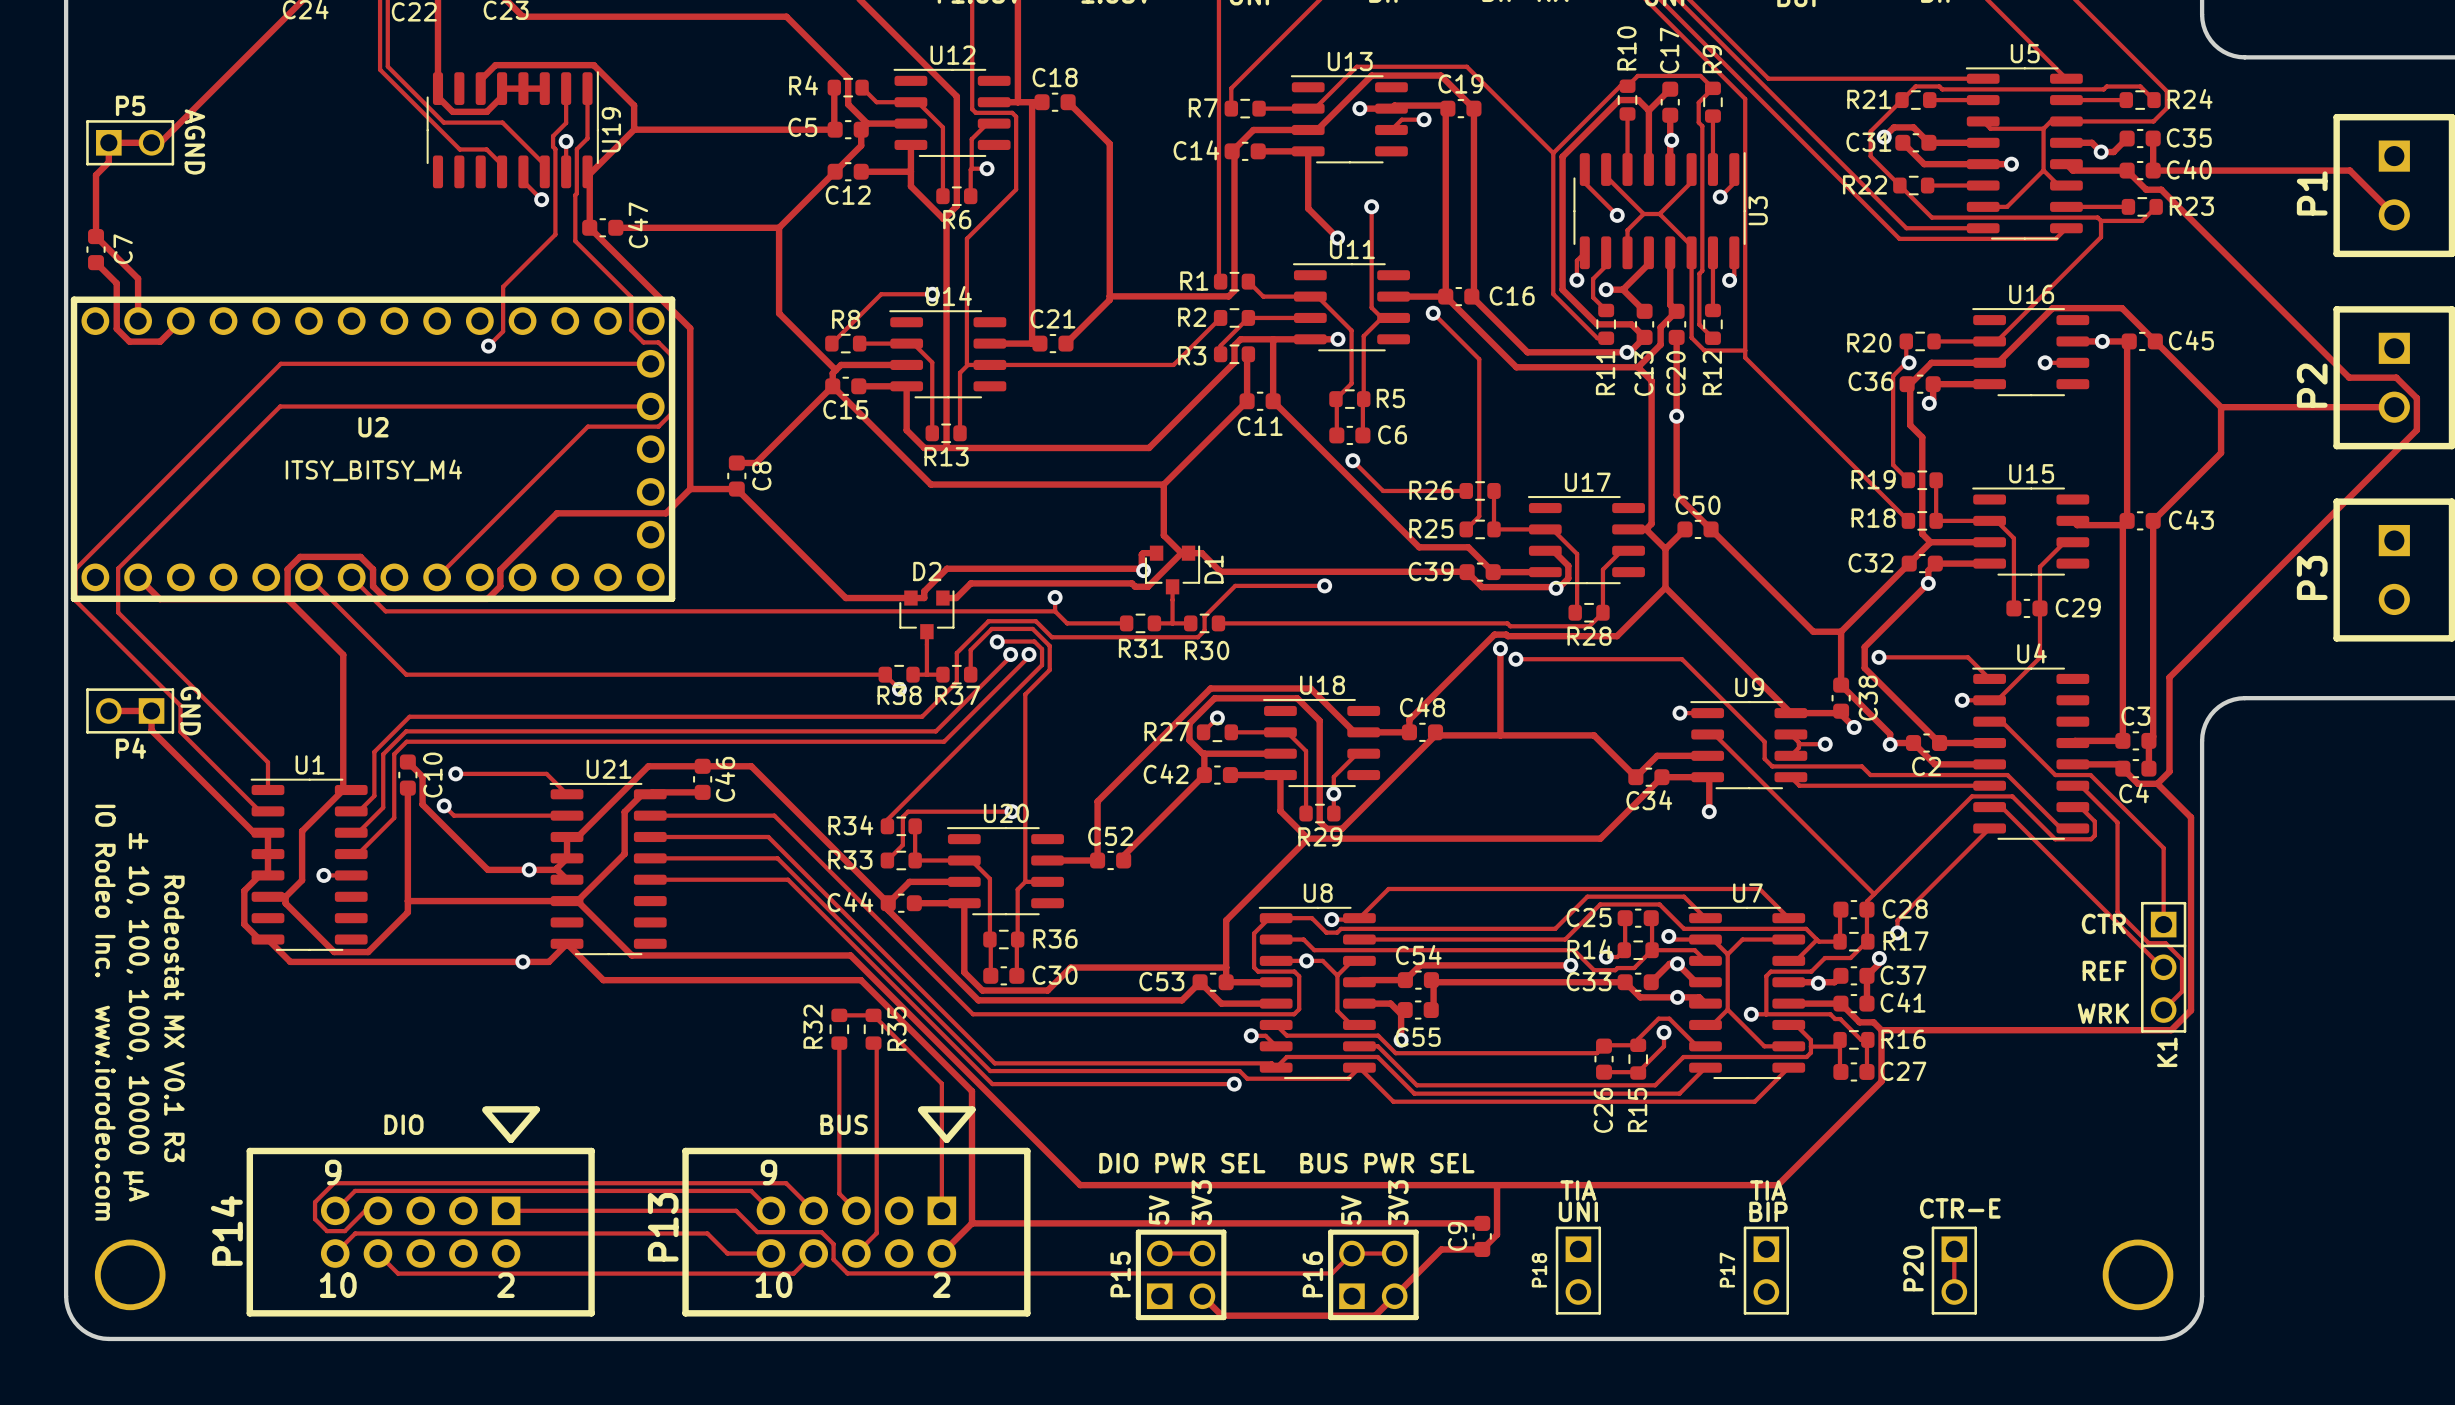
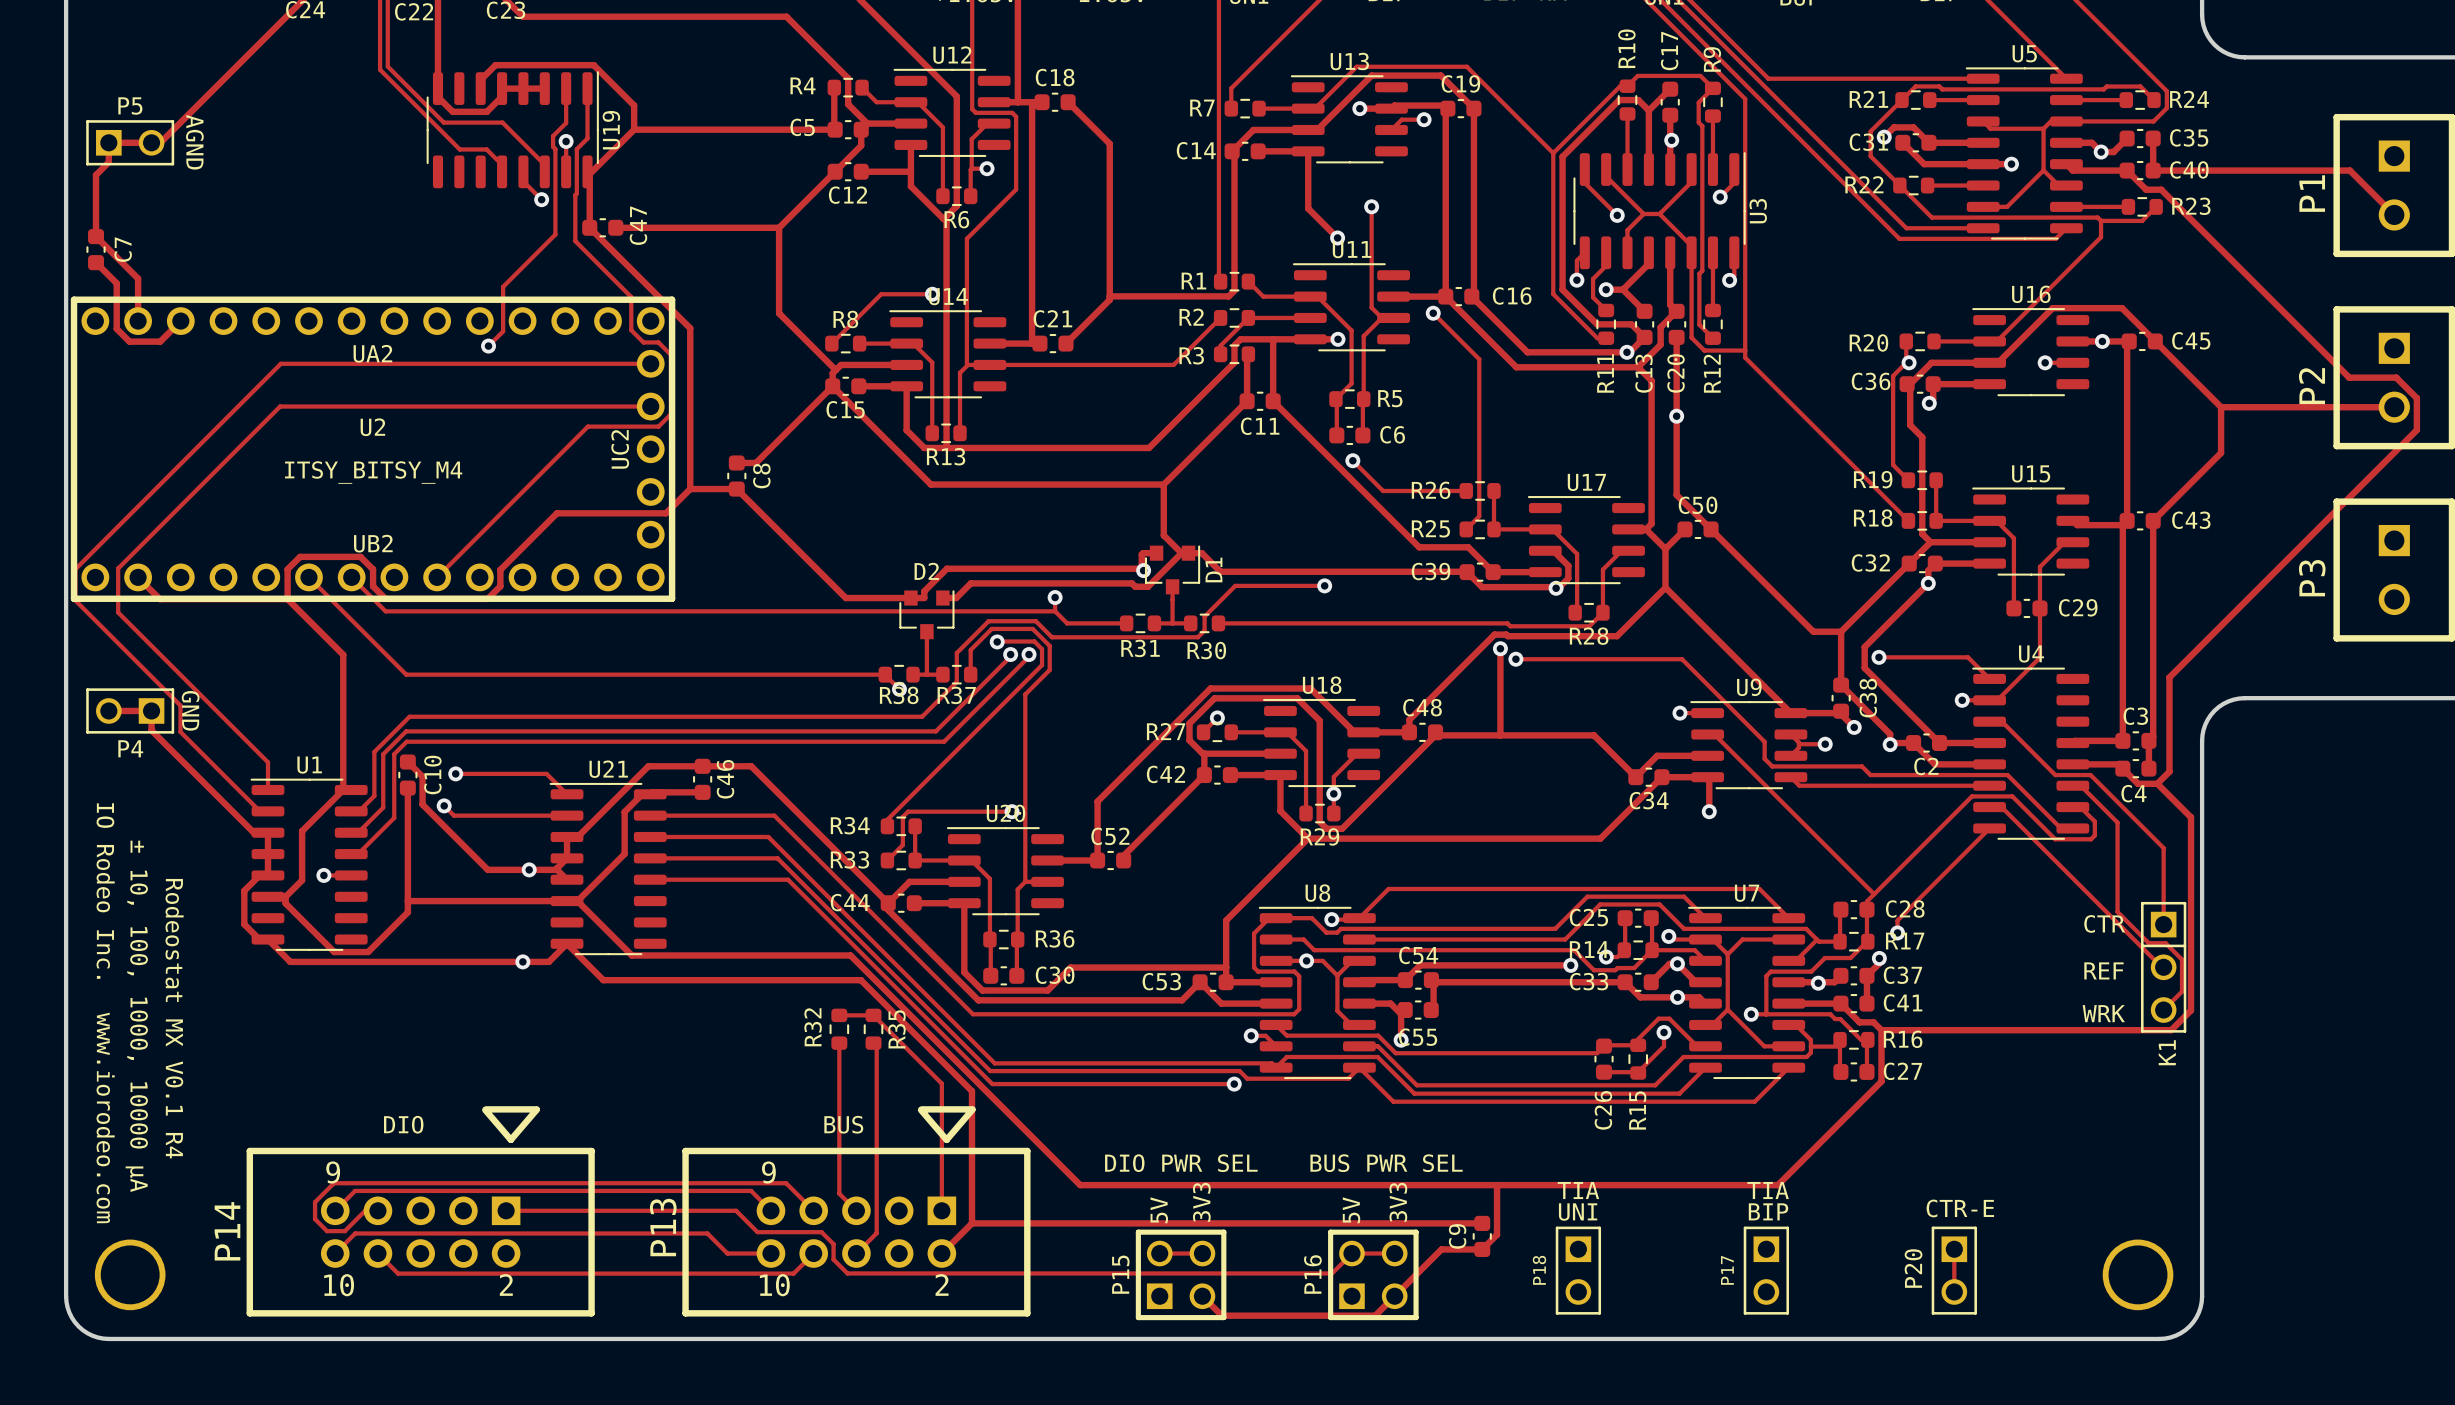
UA2: none -> (372, 353)
UC2: none -> (620, 449)
UB2: none -> (373, 543)
text: Rodeostat MX V0.1 R3 (174, 1018) -> Rodeostat MX V0.1 R4 (174, 1018)

